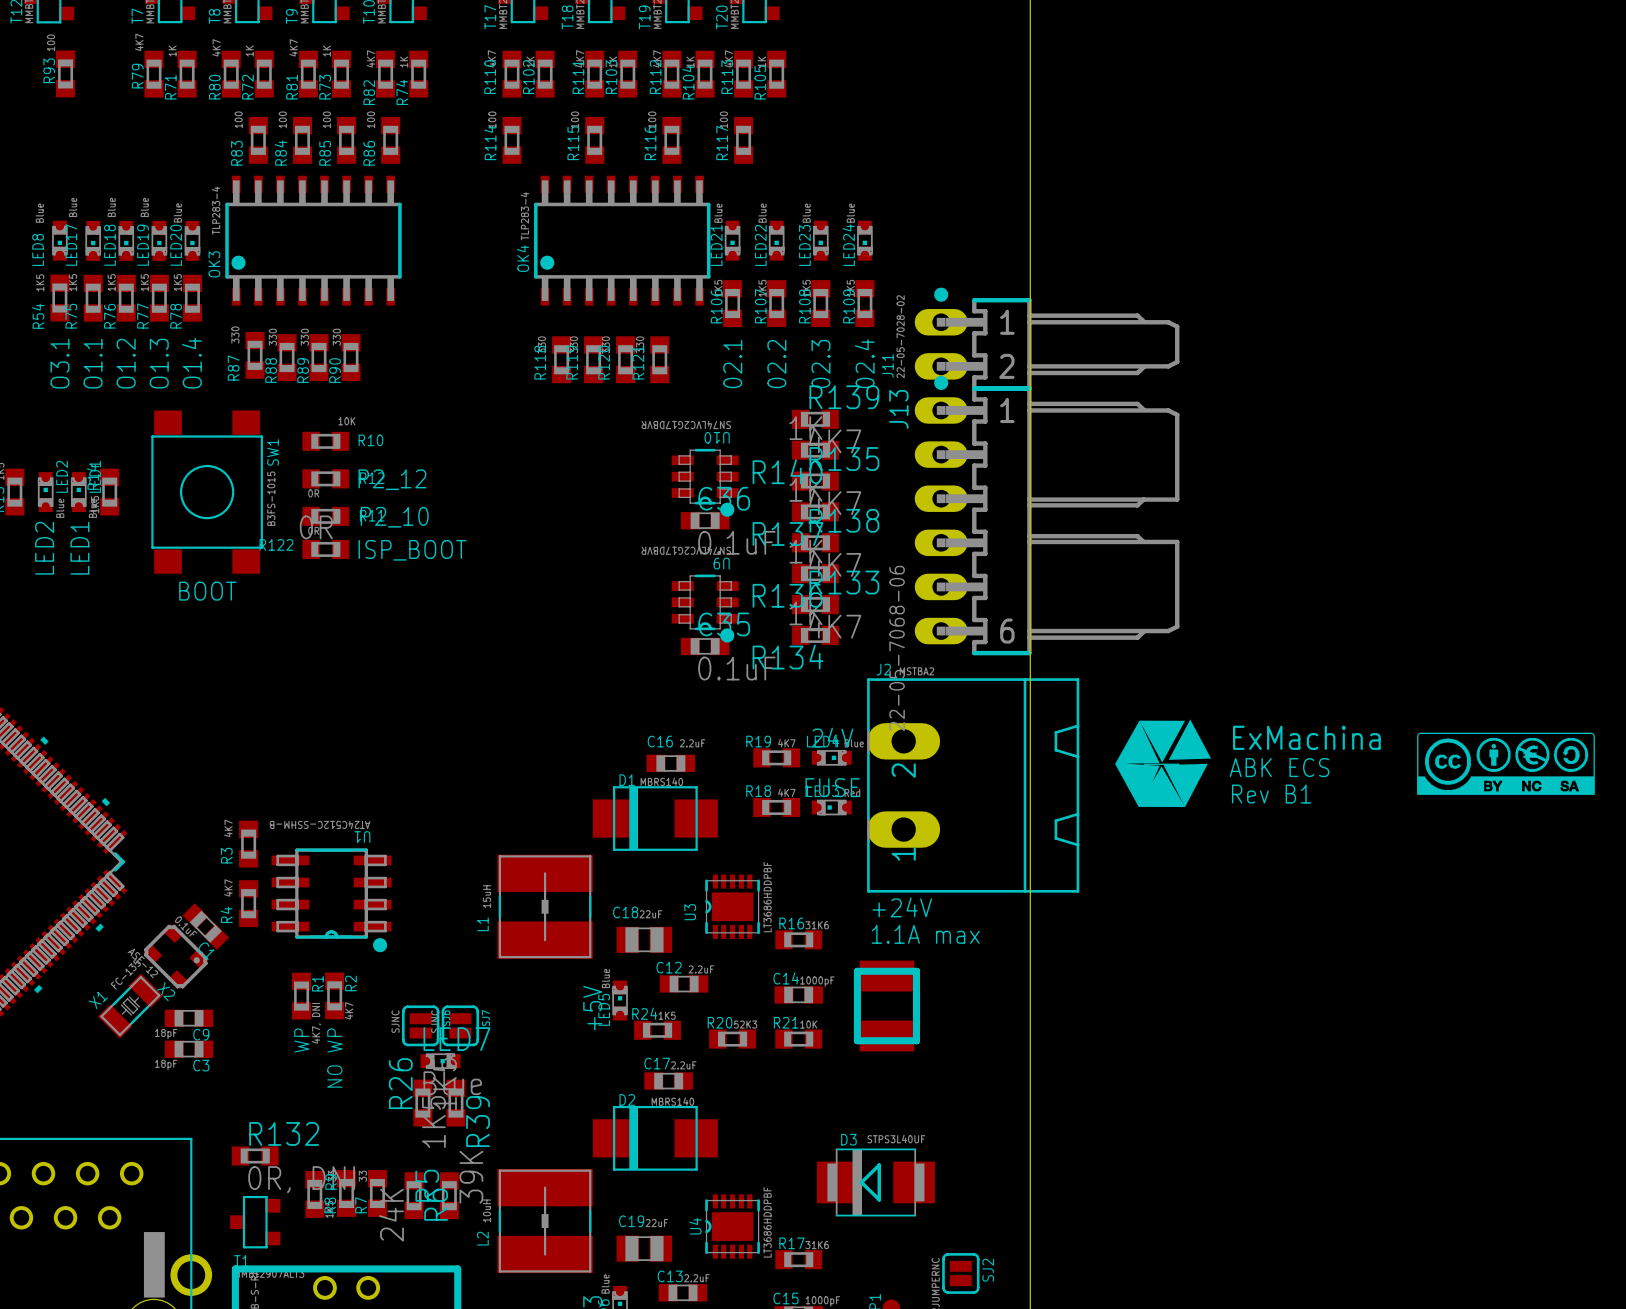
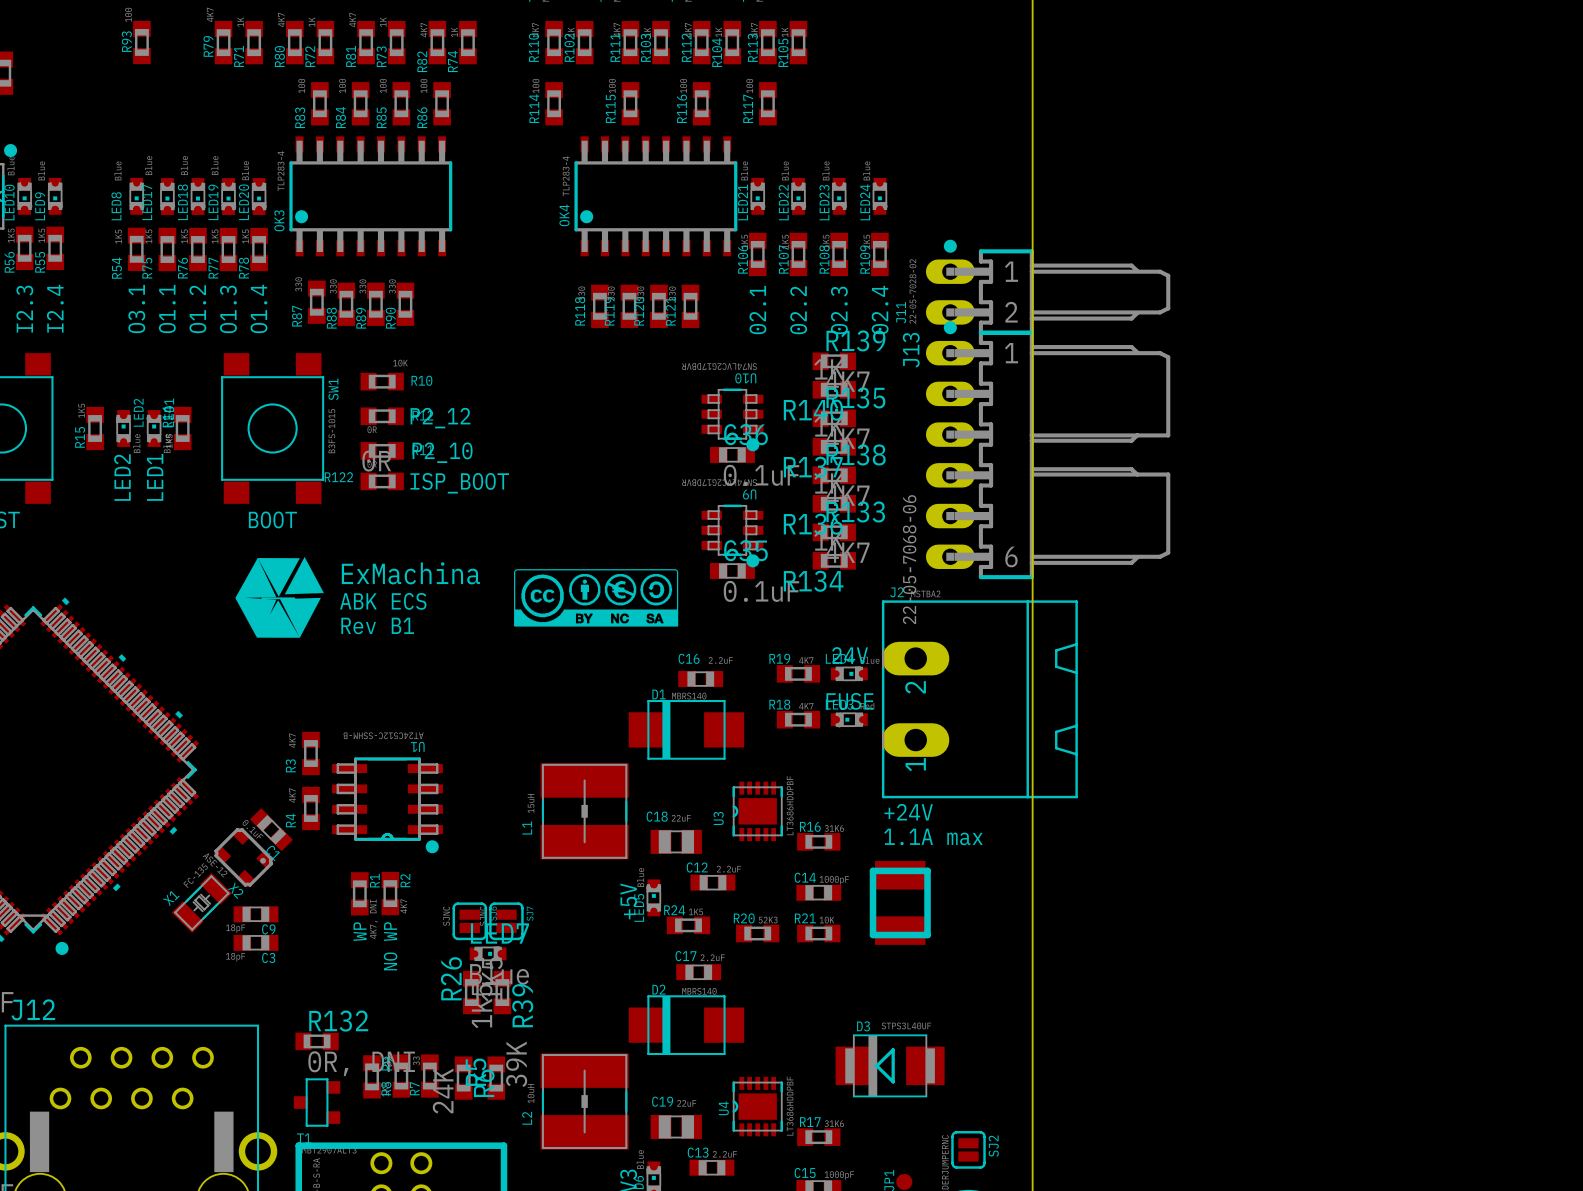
drawing: none -> [235, 556, 679, 638]
text: none -> ABK ECS (383, 601)
text: none -> Rev B1 (377, 625)
drawing: [1115, 719, 1595, 808] -> none
text: ABK ECS (1279, 767) -> none
text: Rev B1 (1271, 794) -> none

